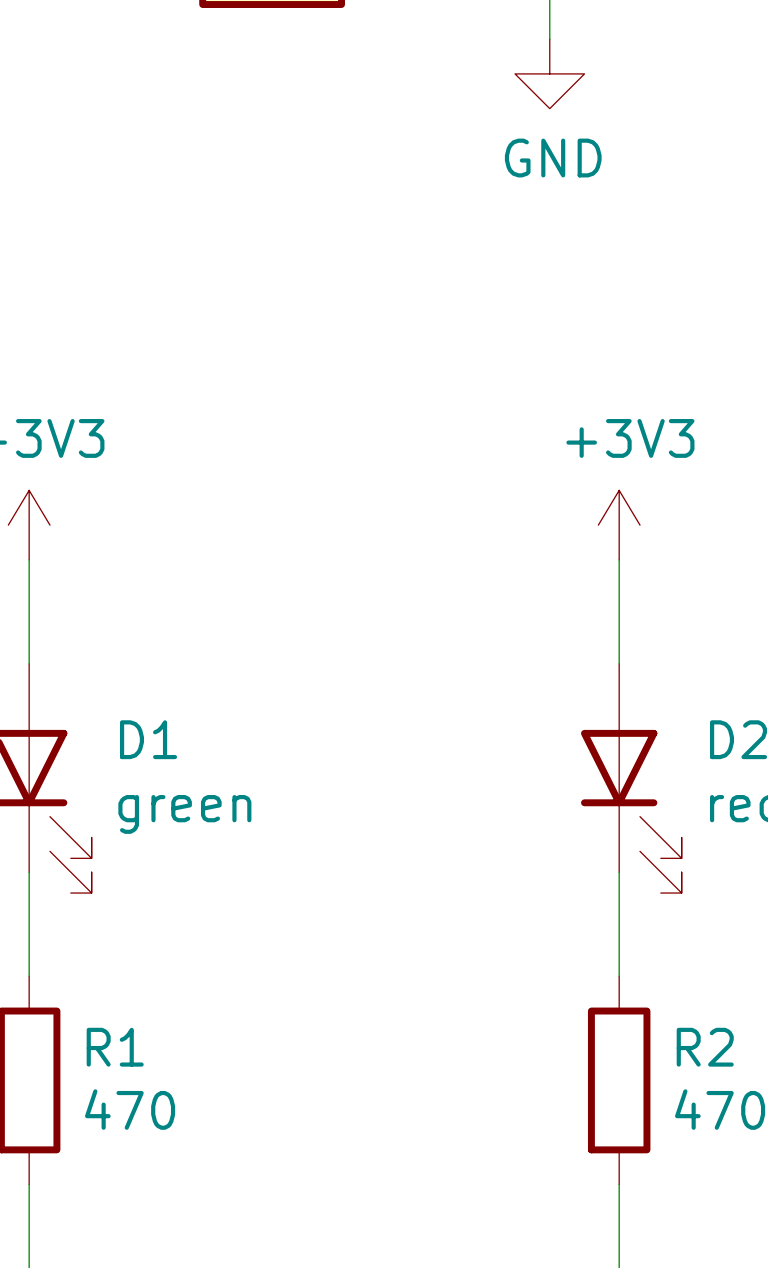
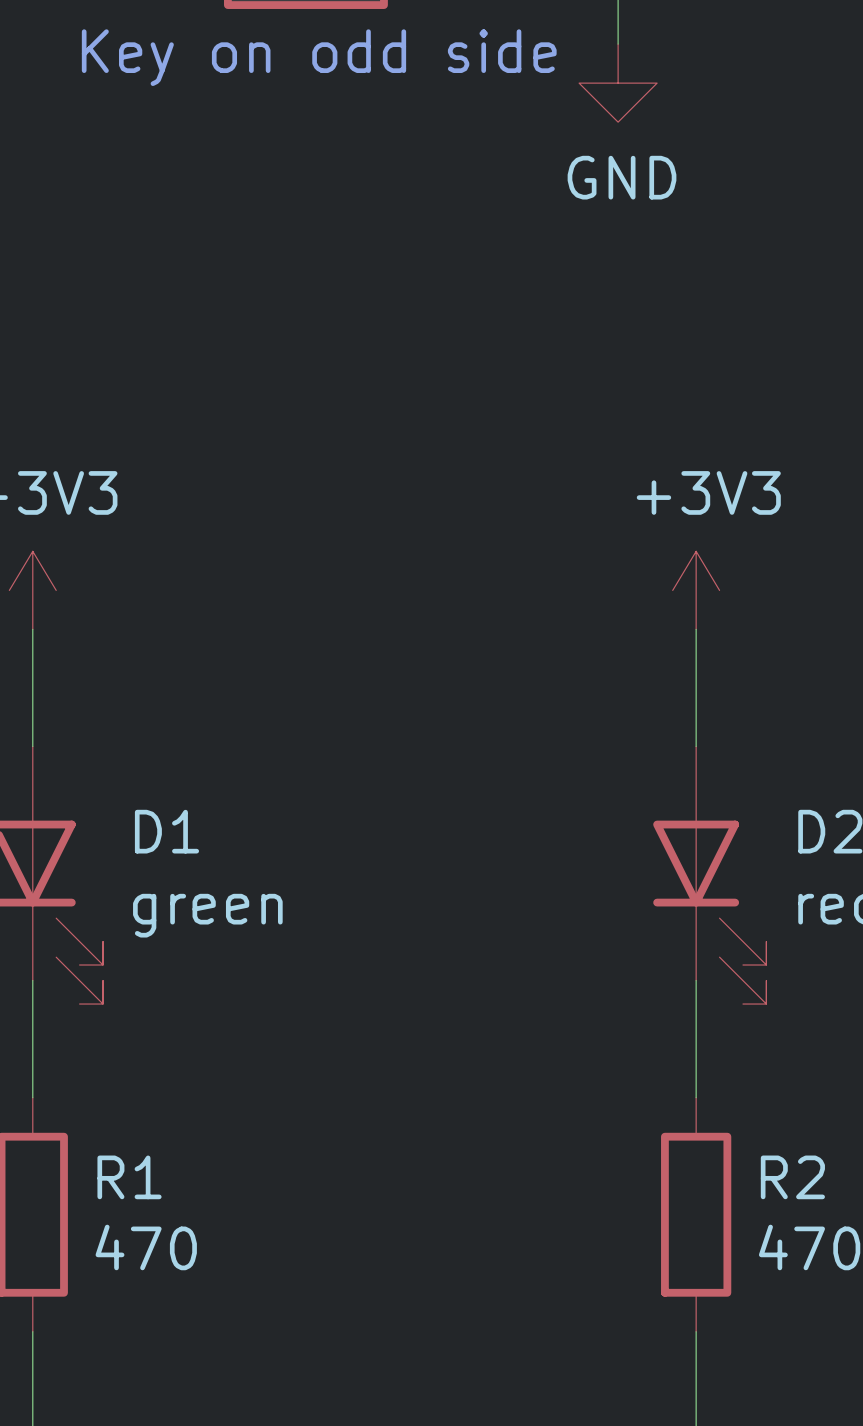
text: none -> Key on odd side (319, 57)

